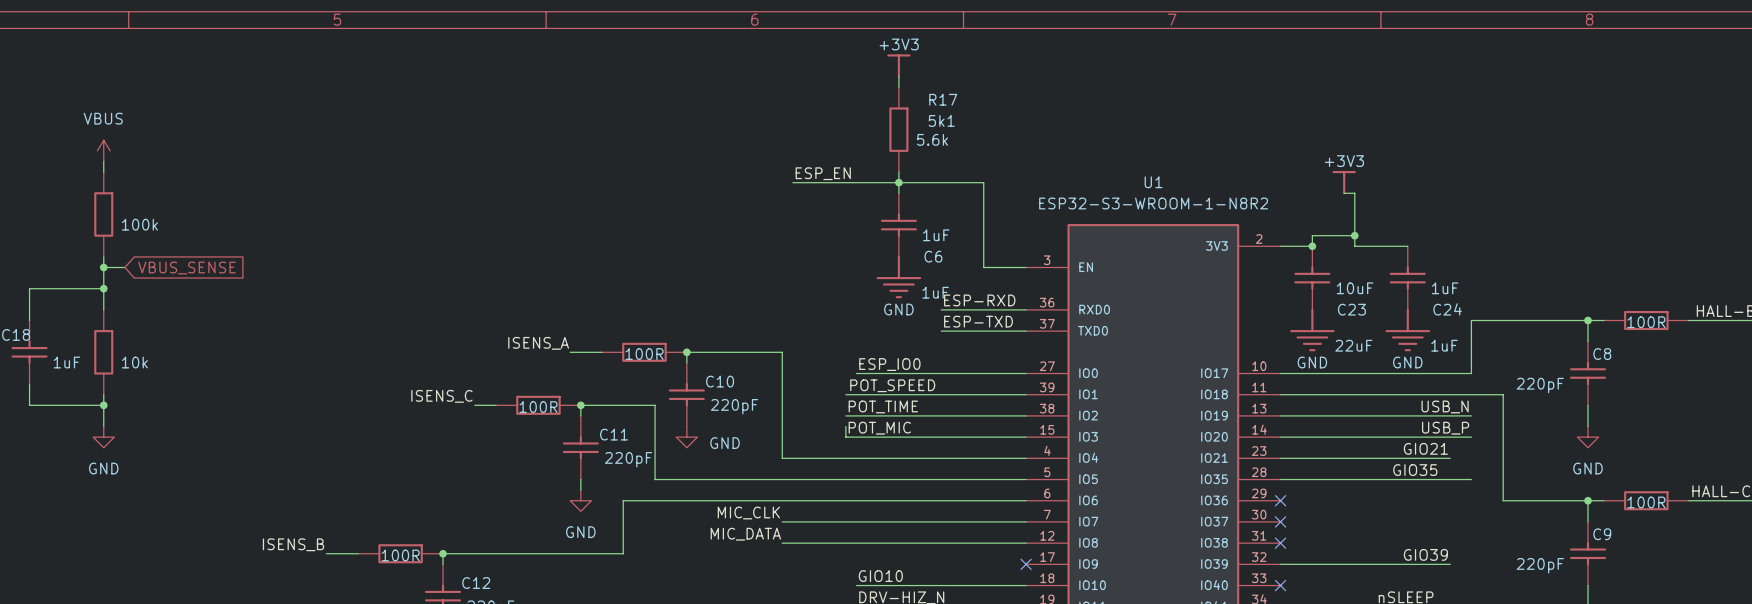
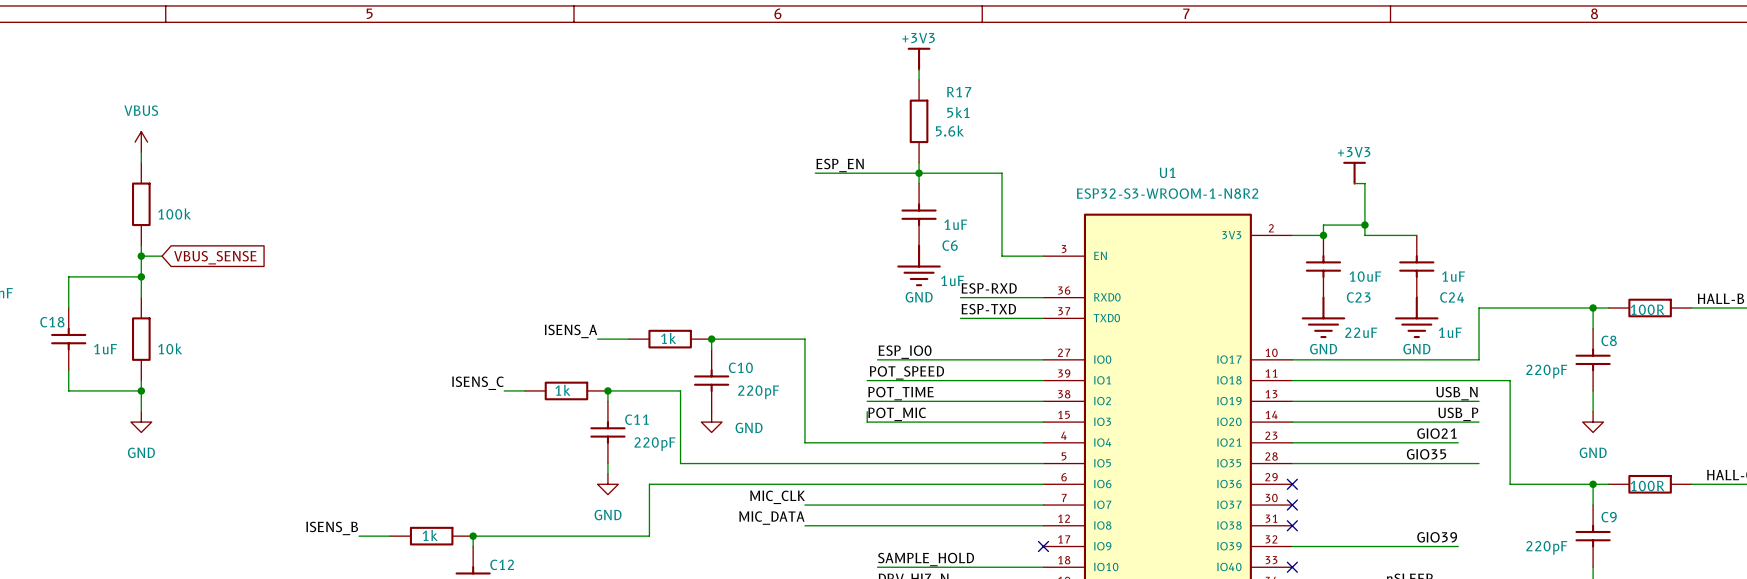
part text: 100R (644, 354) -> 1k (668, 338)
part text: 100R (538, 407) -> 1k (562, 390)
part text: 100R (400, 555) -> 1k (430, 535)
label: GIO10 (880, 576) -> SAMPLE_HOLD (926, 559)

